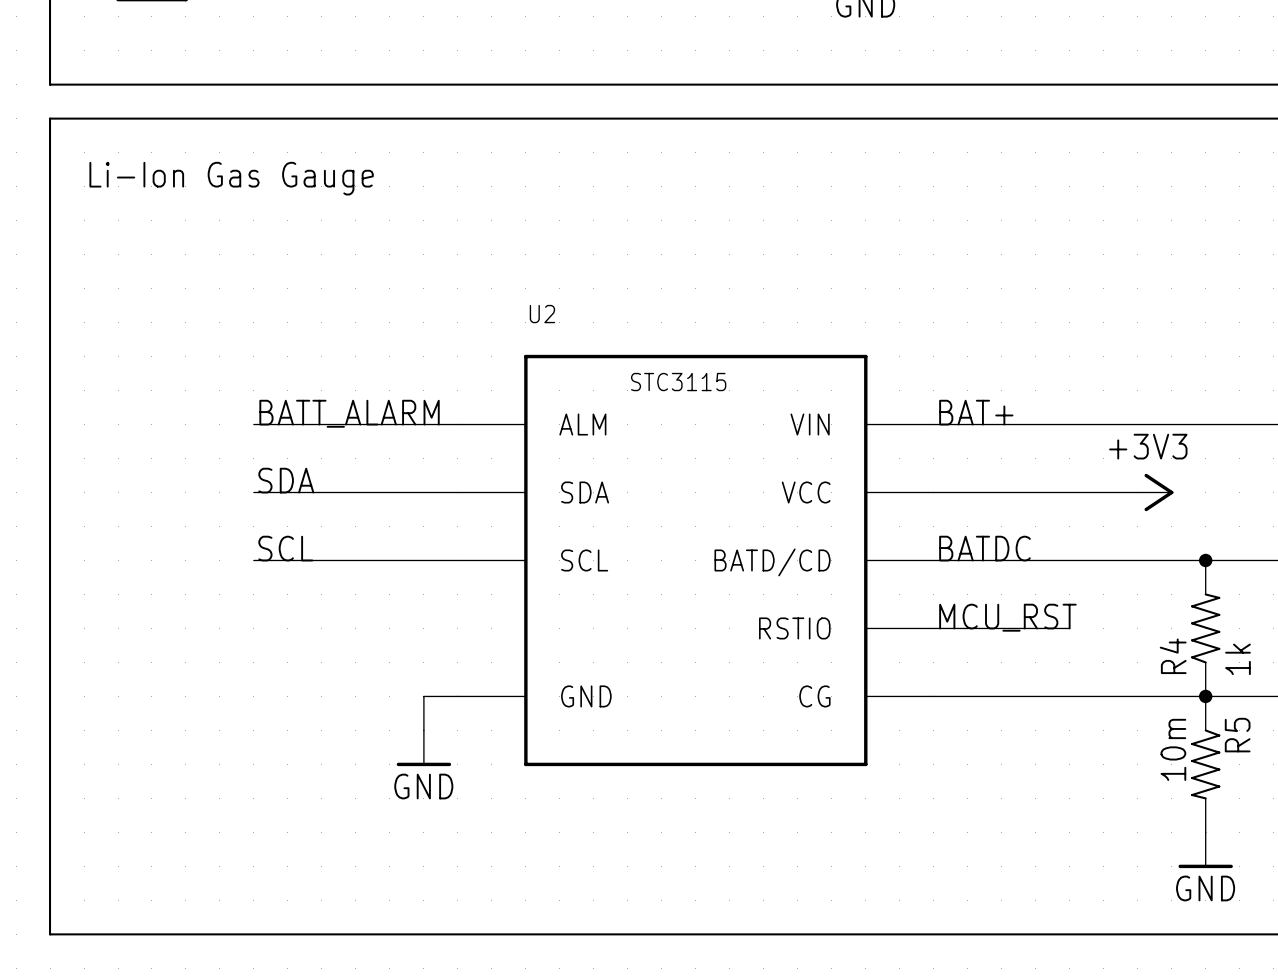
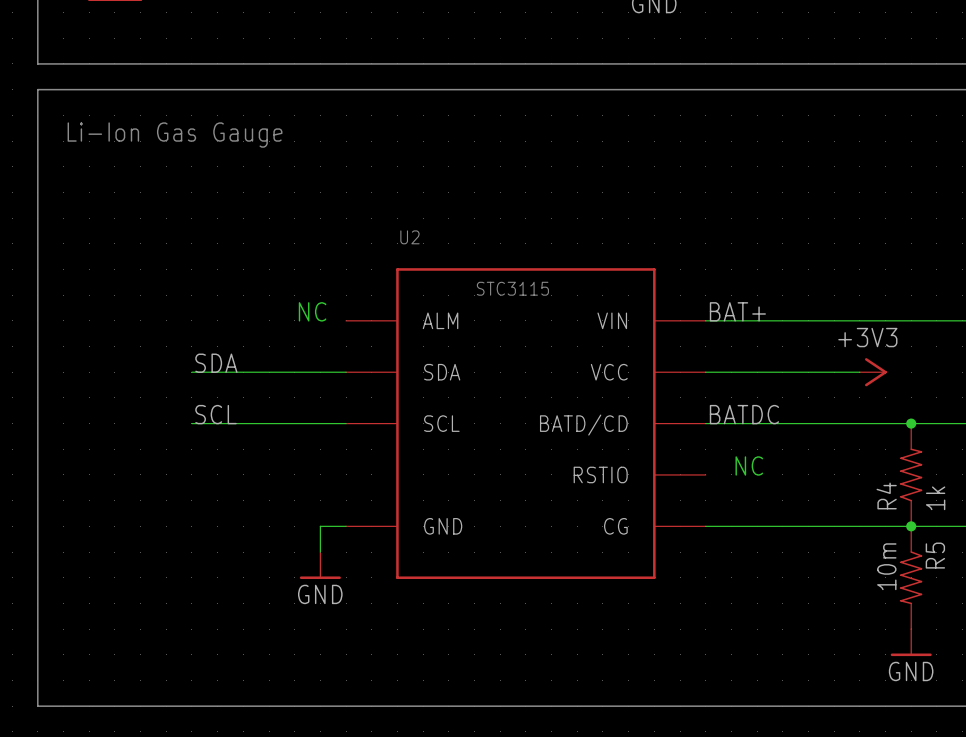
text: none -> NC (312, 311)
label: BATT_ALARM (349, 413) -> none
wire: (253, 424) (457, 424) -> none
text: none -> NC (749, 465)
label: MCU_RST (1007, 617) -> none
wire: (933, 628) (1069, 628) -> none

